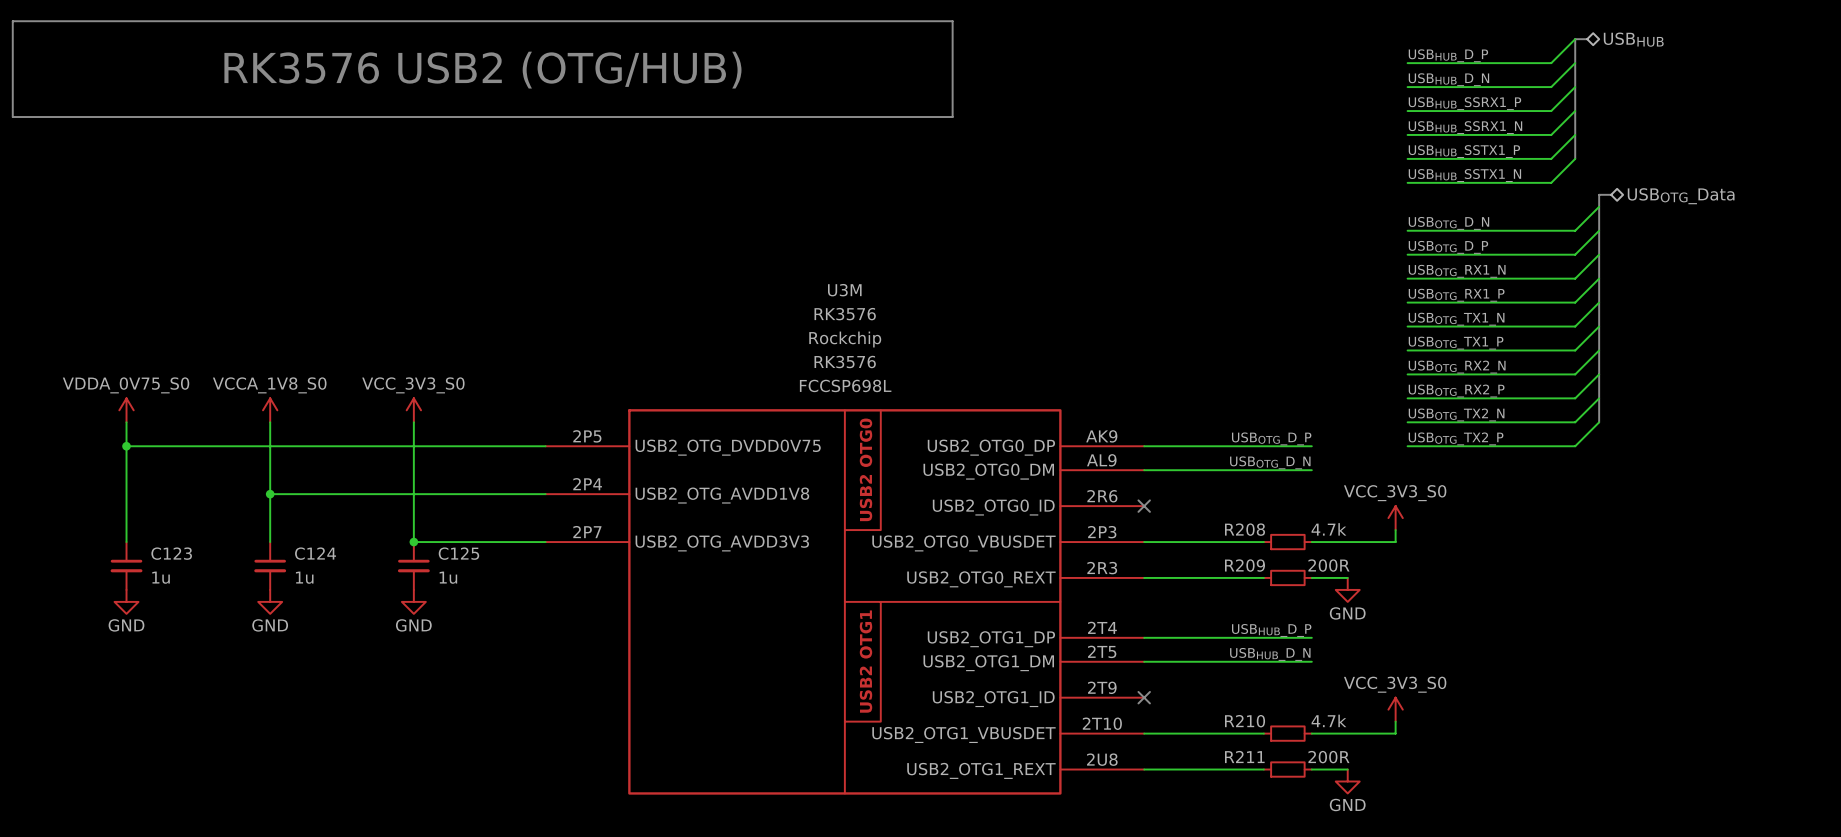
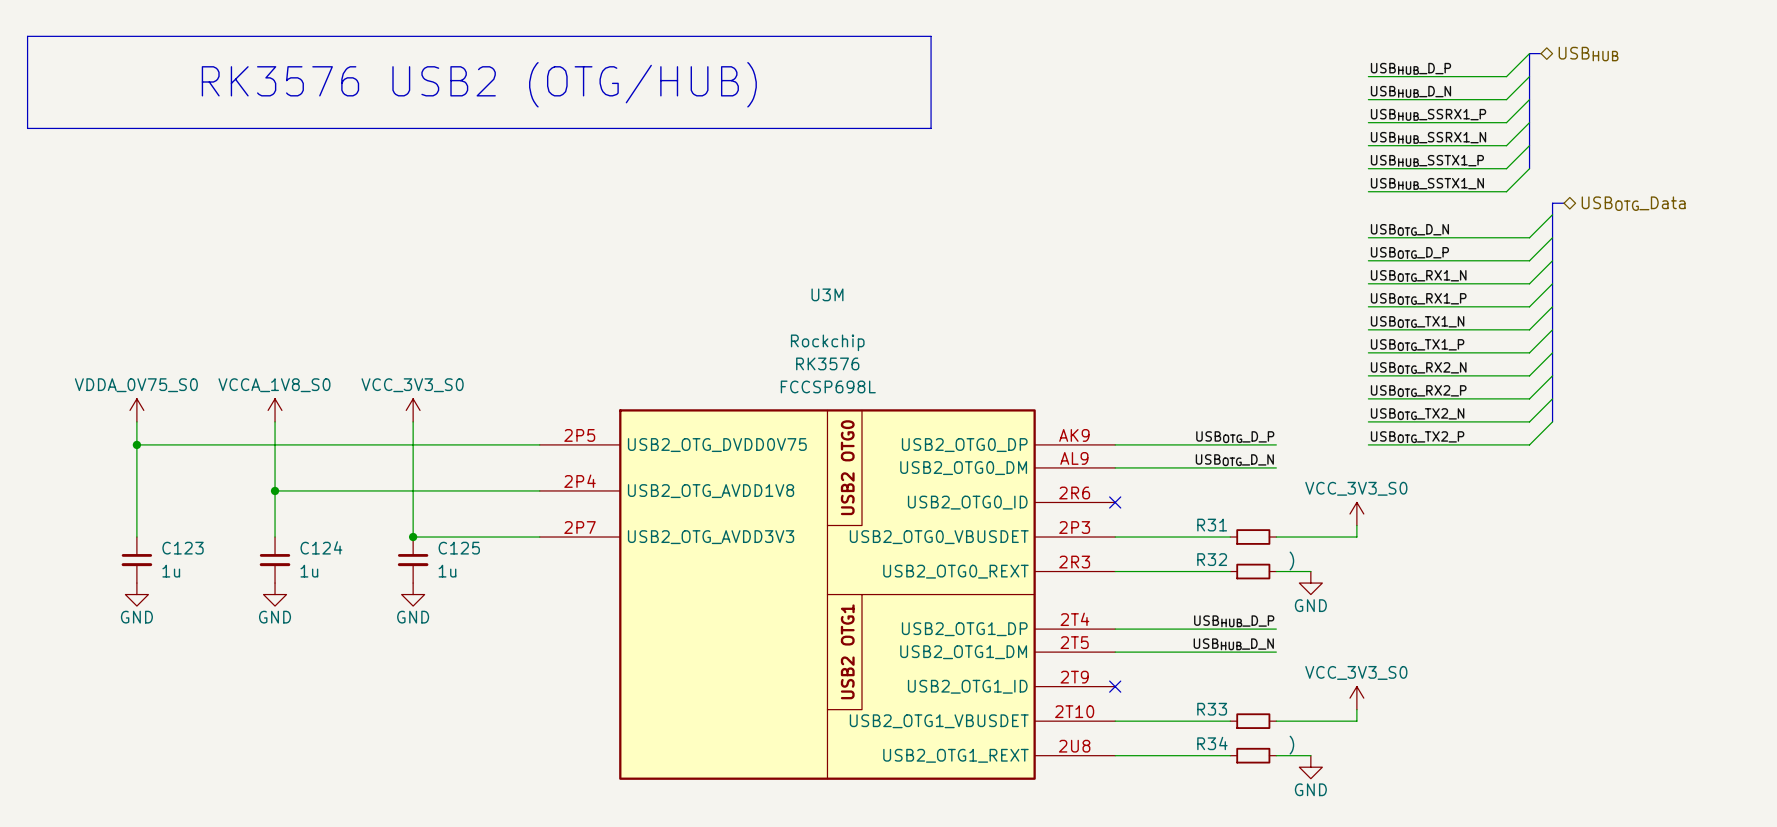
U3M value: RK3576 (845, 314) -> none
R208 name: R208 (1245, 529) -> R31 (1212, 525)
R208 value: 4.7k (1328, 529) -> none
R209 name: R209 (1244, 565) -> R32 (1212, 559)
R209 value: 200R (1328, 565) -> ) (1291, 560)
R210 value: 4.7k (1328, 720) -> none
R210 name: R210 (1245, 721) -> R33 (1212, 709)
R211 name: R211 (1244, 756) -> R34 (1212, 743)
R211 value: 200R (1328, 757) -> ) (1291, 745)

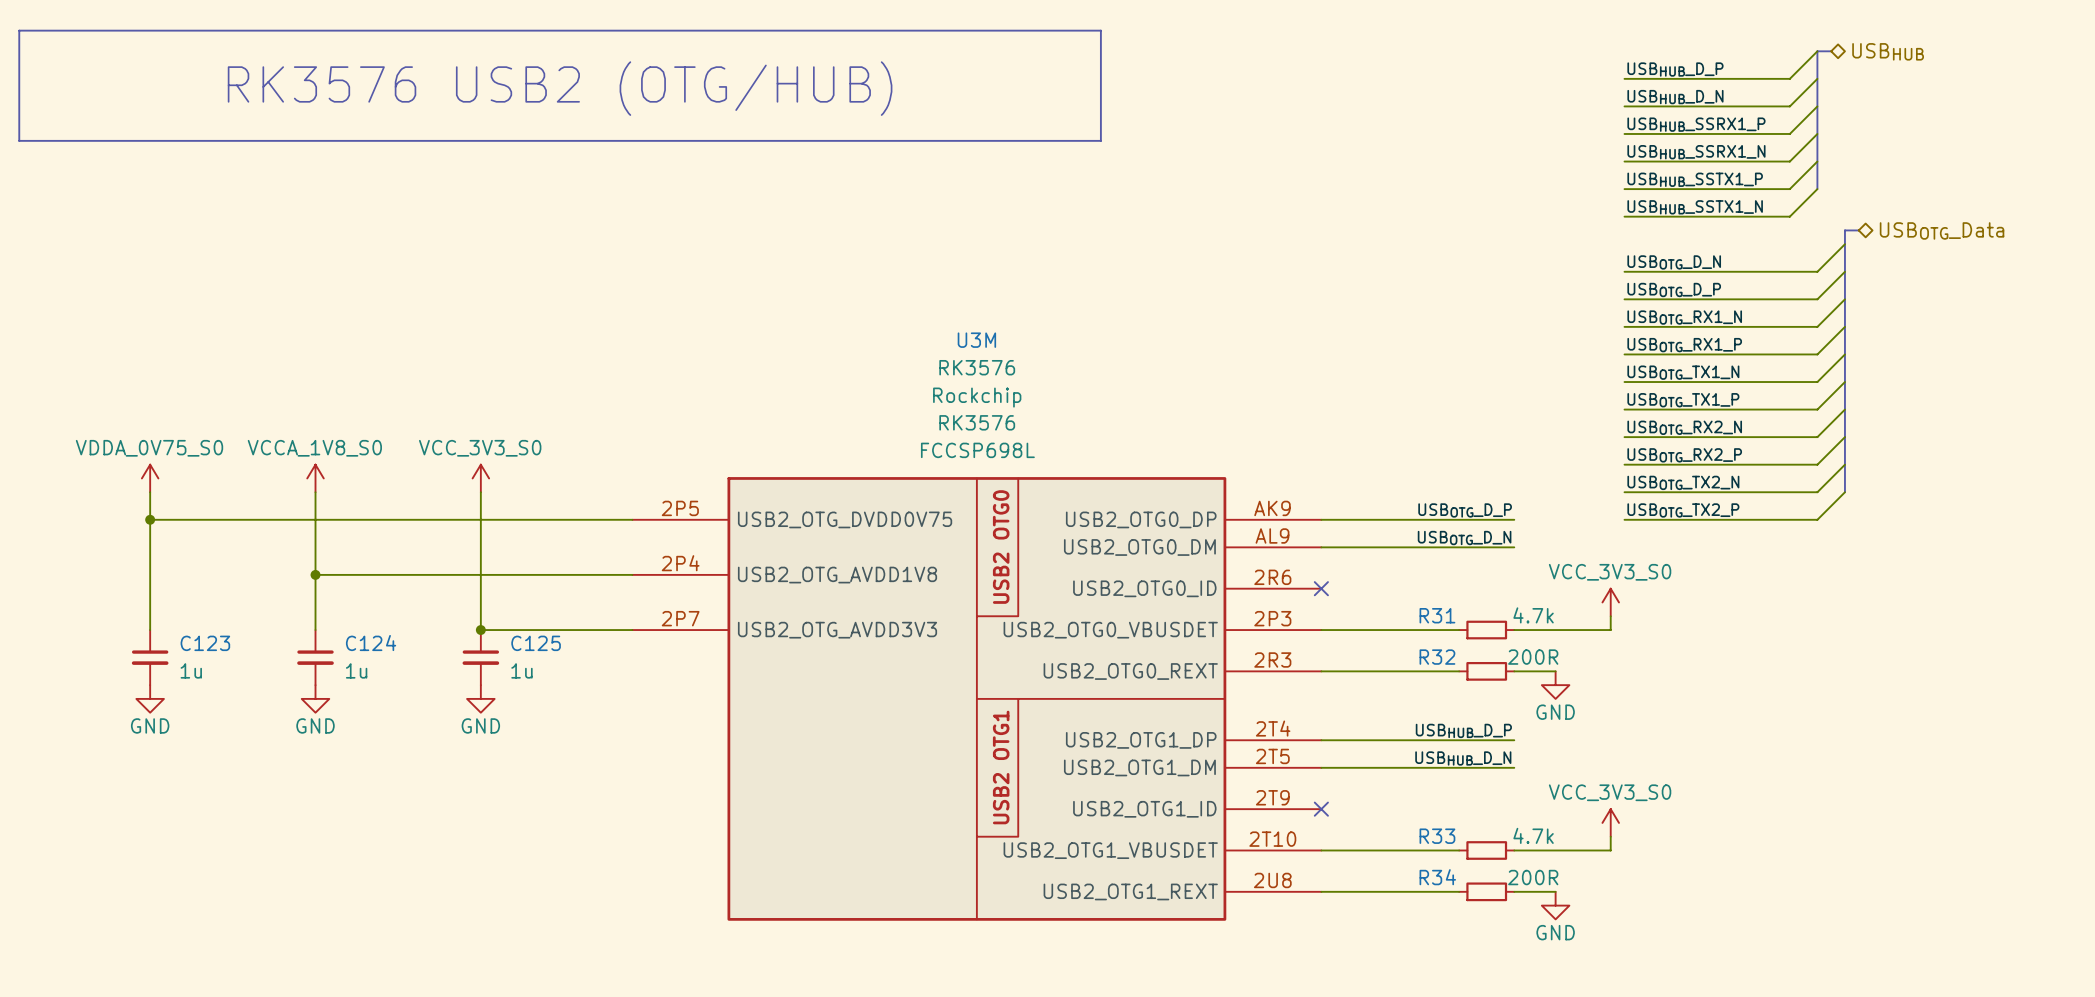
U3M value: none -> RK3576 (977, 367)
R31 value: none -> 4.7k (1533, 615)
R32 value: ) (1291, 560) -> 200R (1533, 657)
R33 value: none -> 4.7k (1533, 835)
R34 value: ) (1291, 745) -> 200R (1533, 877)

